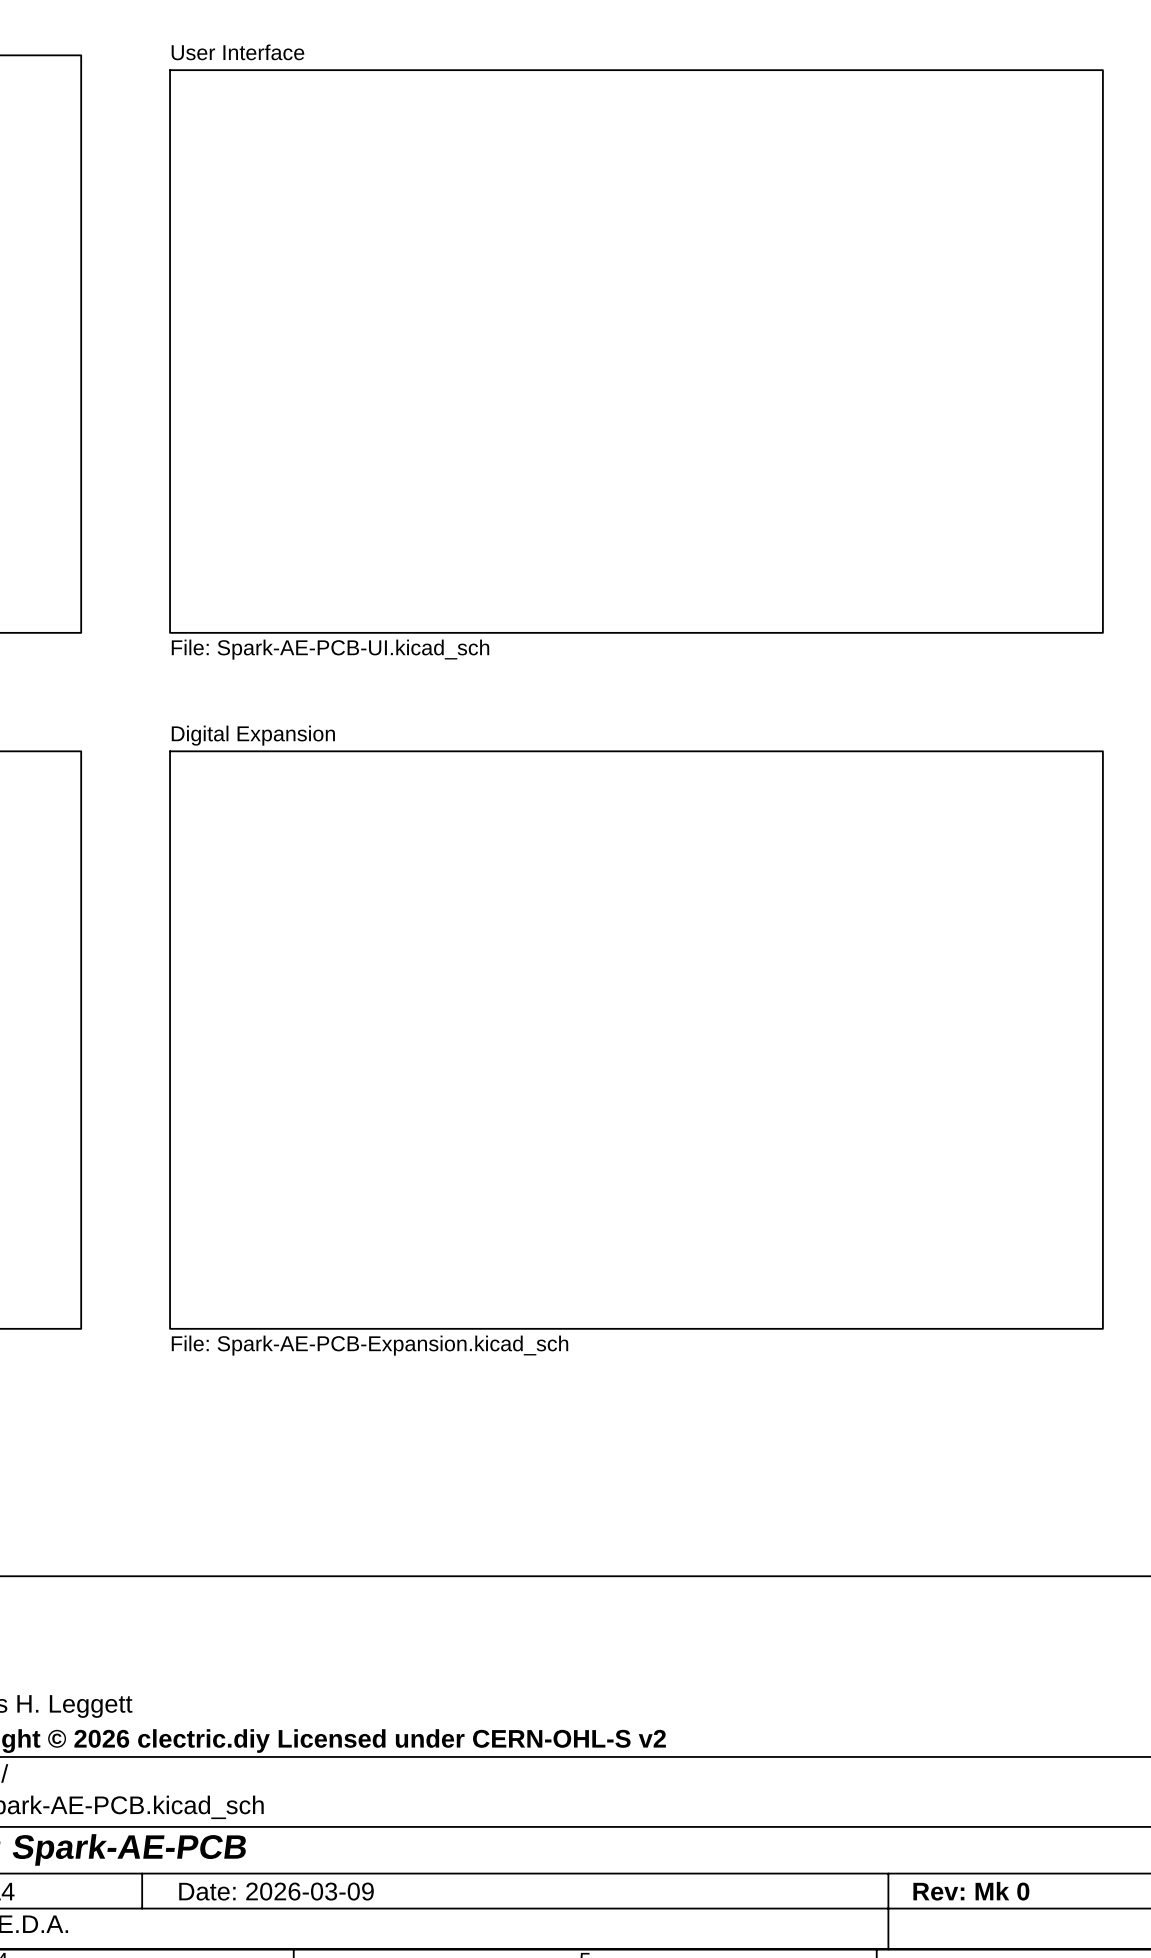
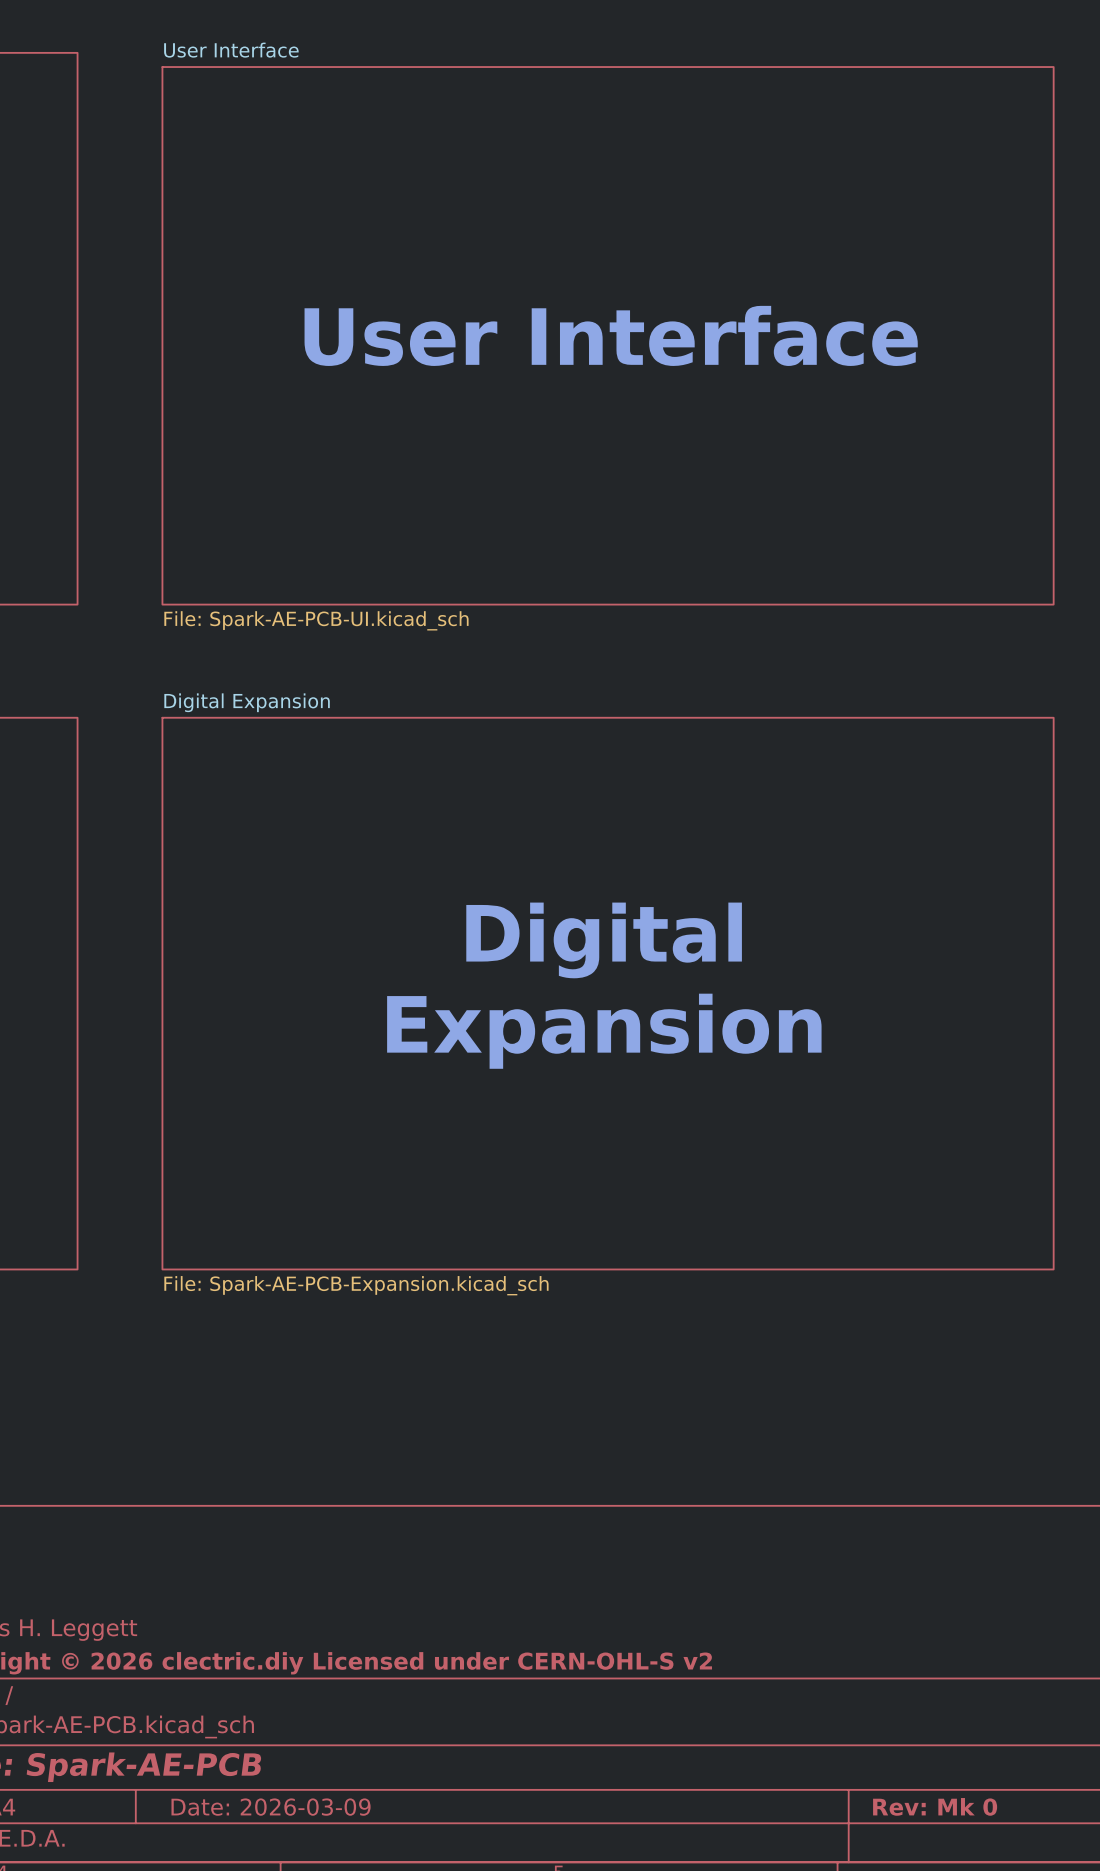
text: none -> User Interface (611, 335)
text: none -> Digital (604, 940)
text: none -> Expansion (604, 1031)

